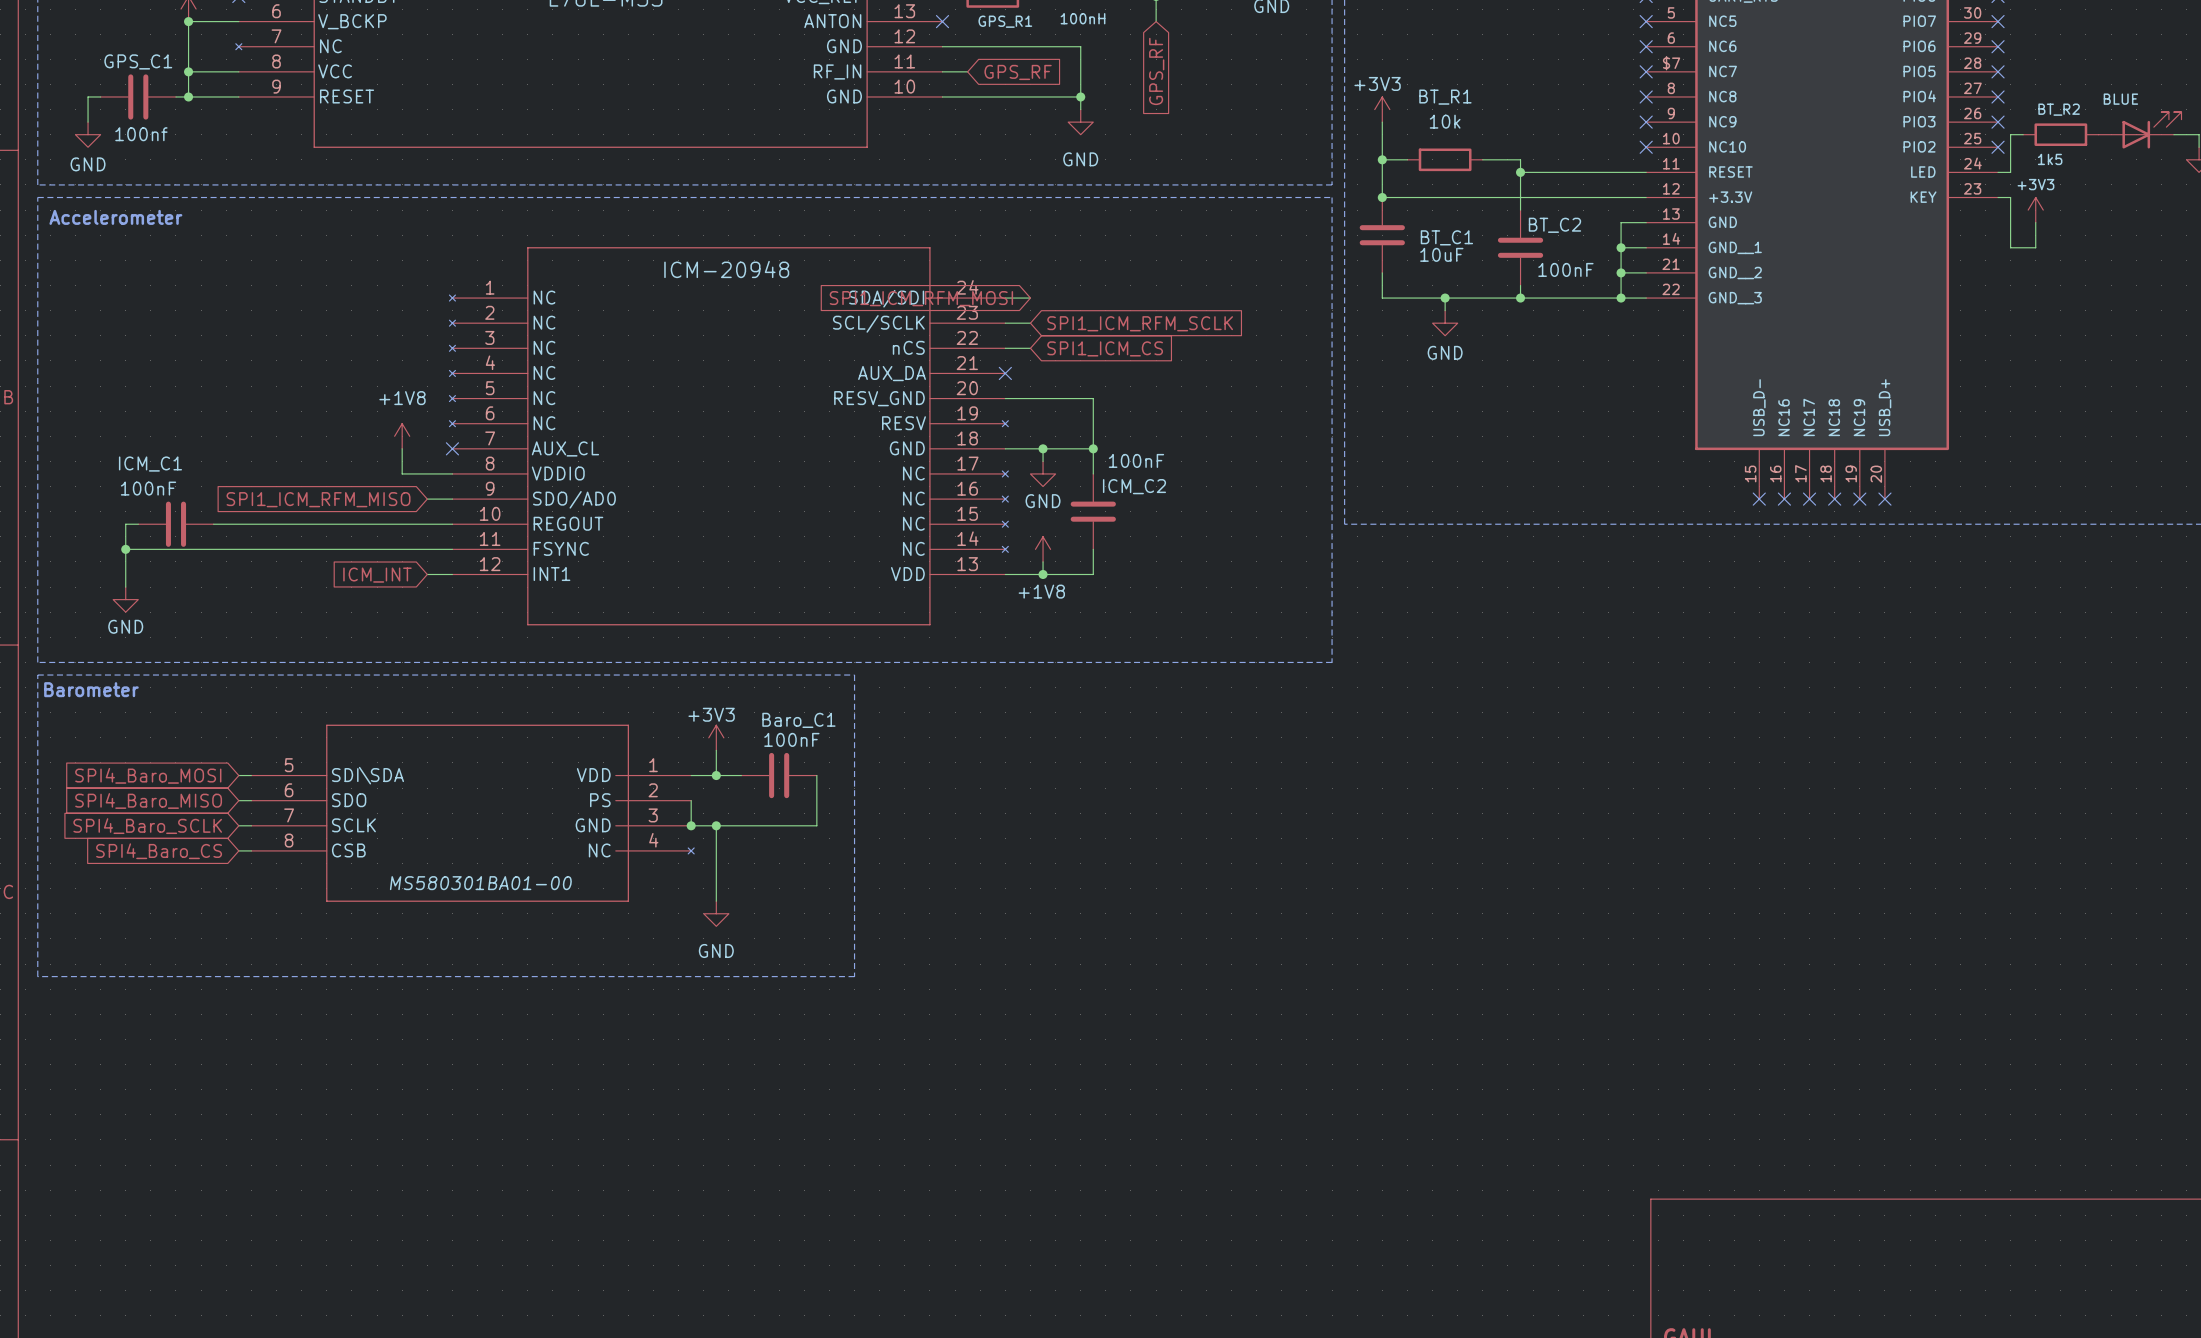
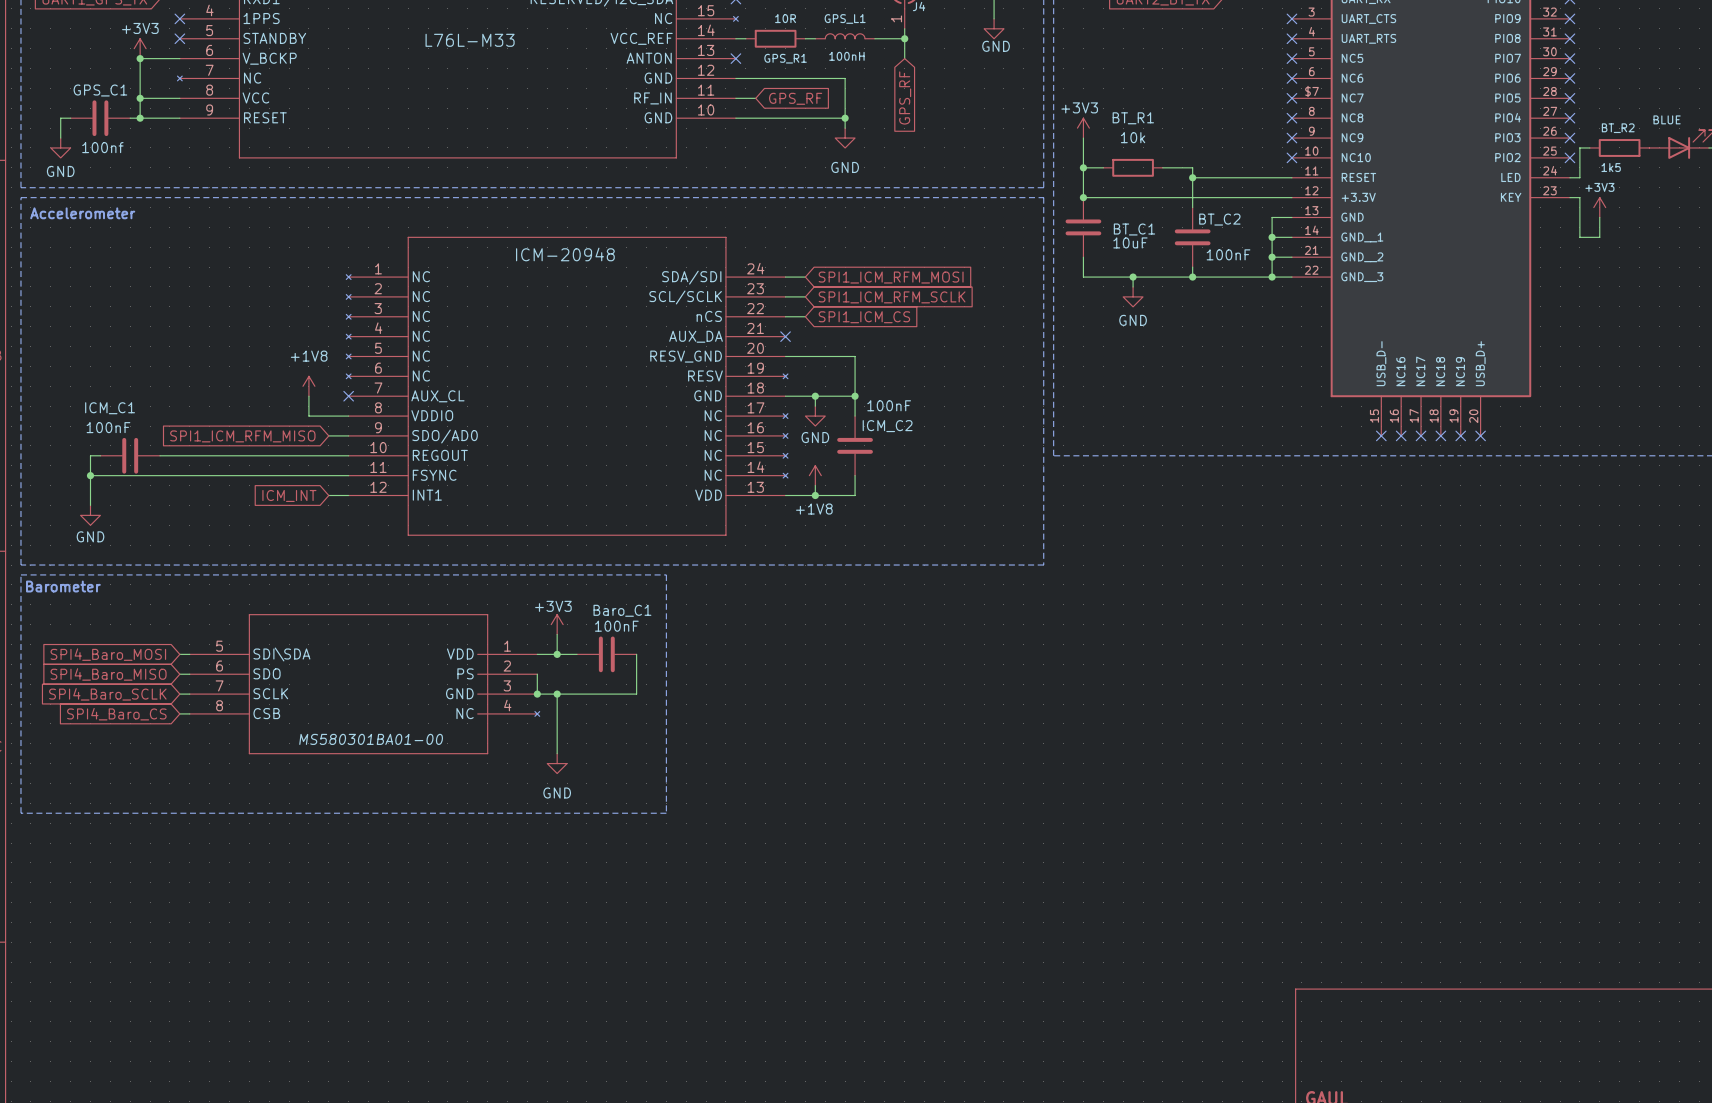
global label rotation: 0° (921, 298) -> 180° (891, 277)
global label position: SPI1_ICM_RFM_MOSI (921, 298) -> SPI1_ICM_RFM_MOSI (891, 277)

